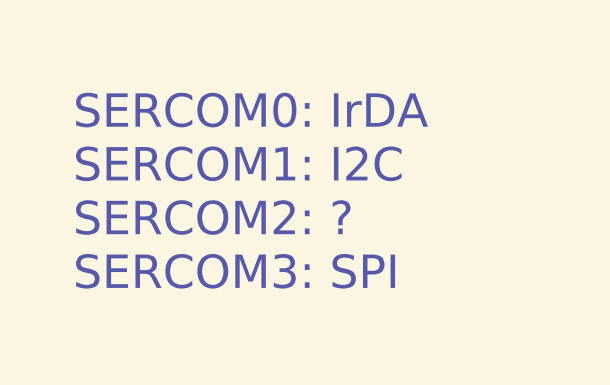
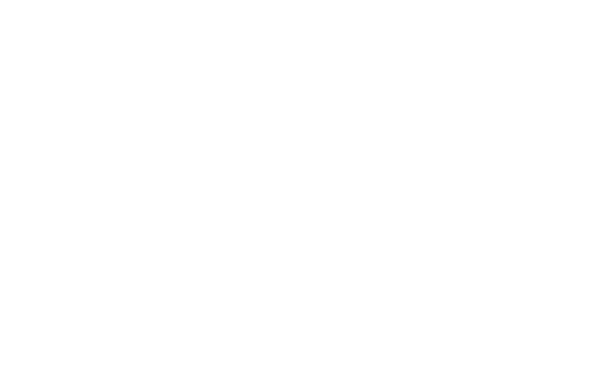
text: SERCOM0: IrDA (251, 110) -> none
text: SERCOM1: I2C (238, 163) -> none
text: SERCOM2: ? (213, 217) -> none
text: SERCOM3: SPI (235, 271) -> none

